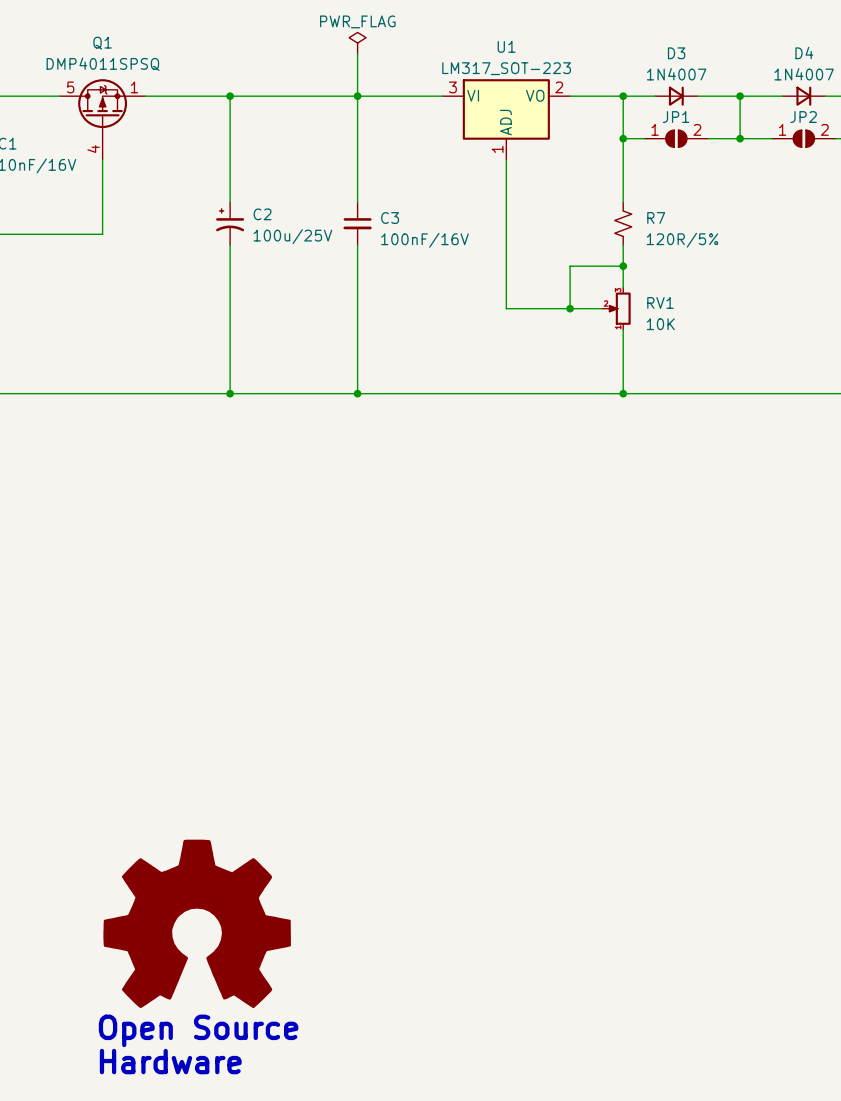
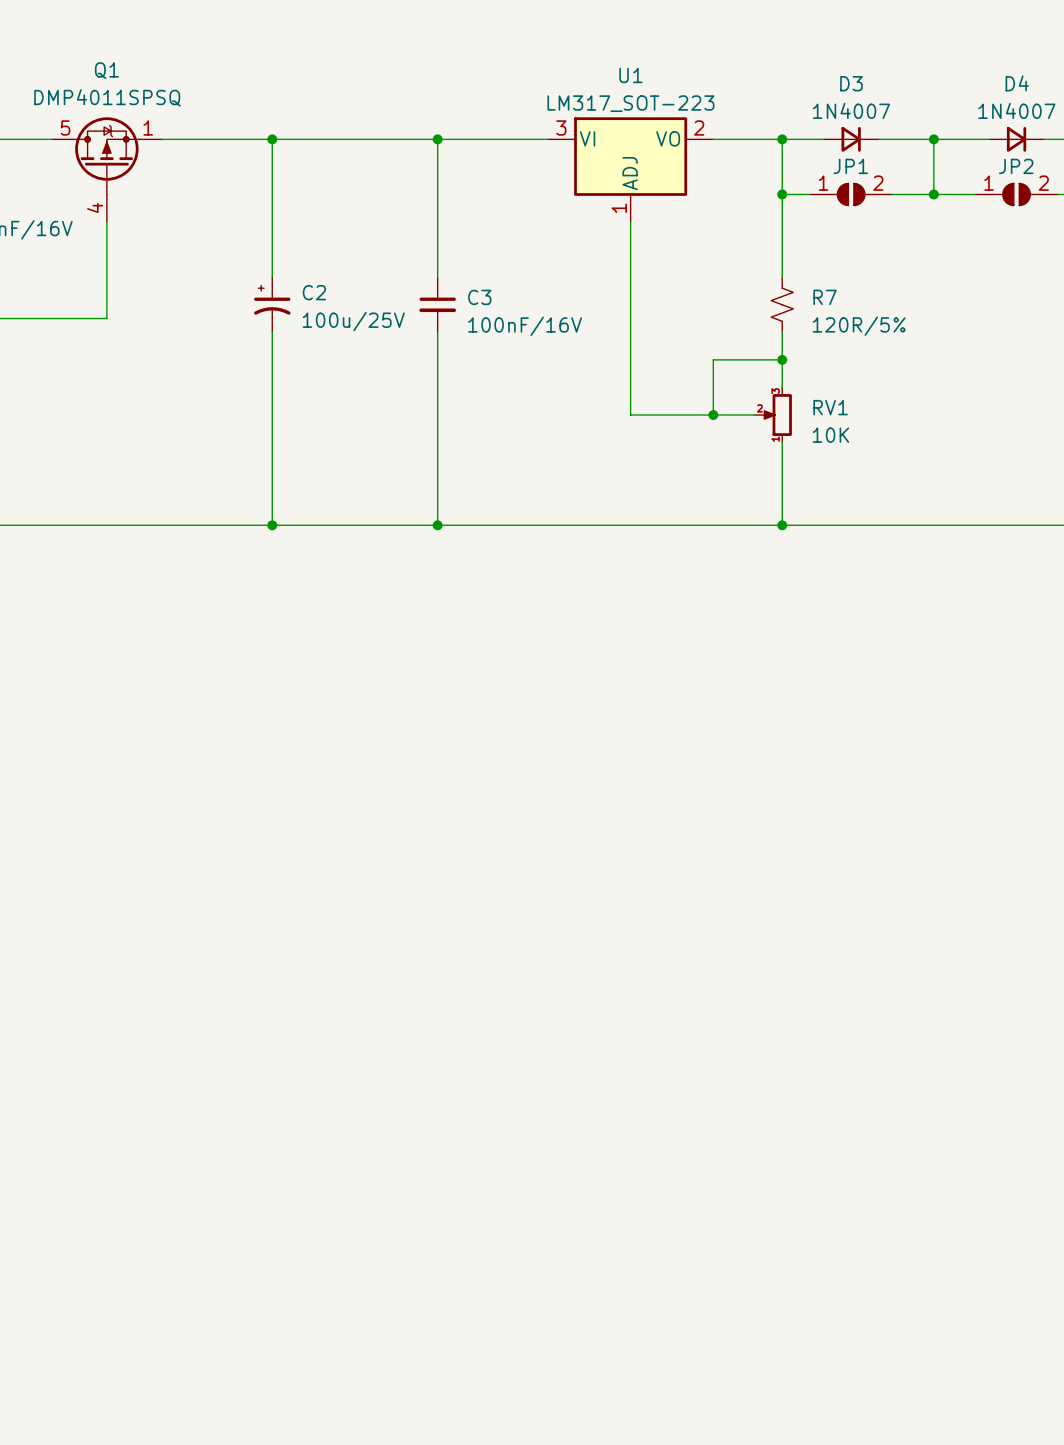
power symbol: PWR_FLAG (357, 43) -> none
wire: (357, 53) (357, 96) -> none
power symbol: (197, 923) -> none
text: Open Source (198, 1030) -> none
text: Hardware (170, 1061) -> none

